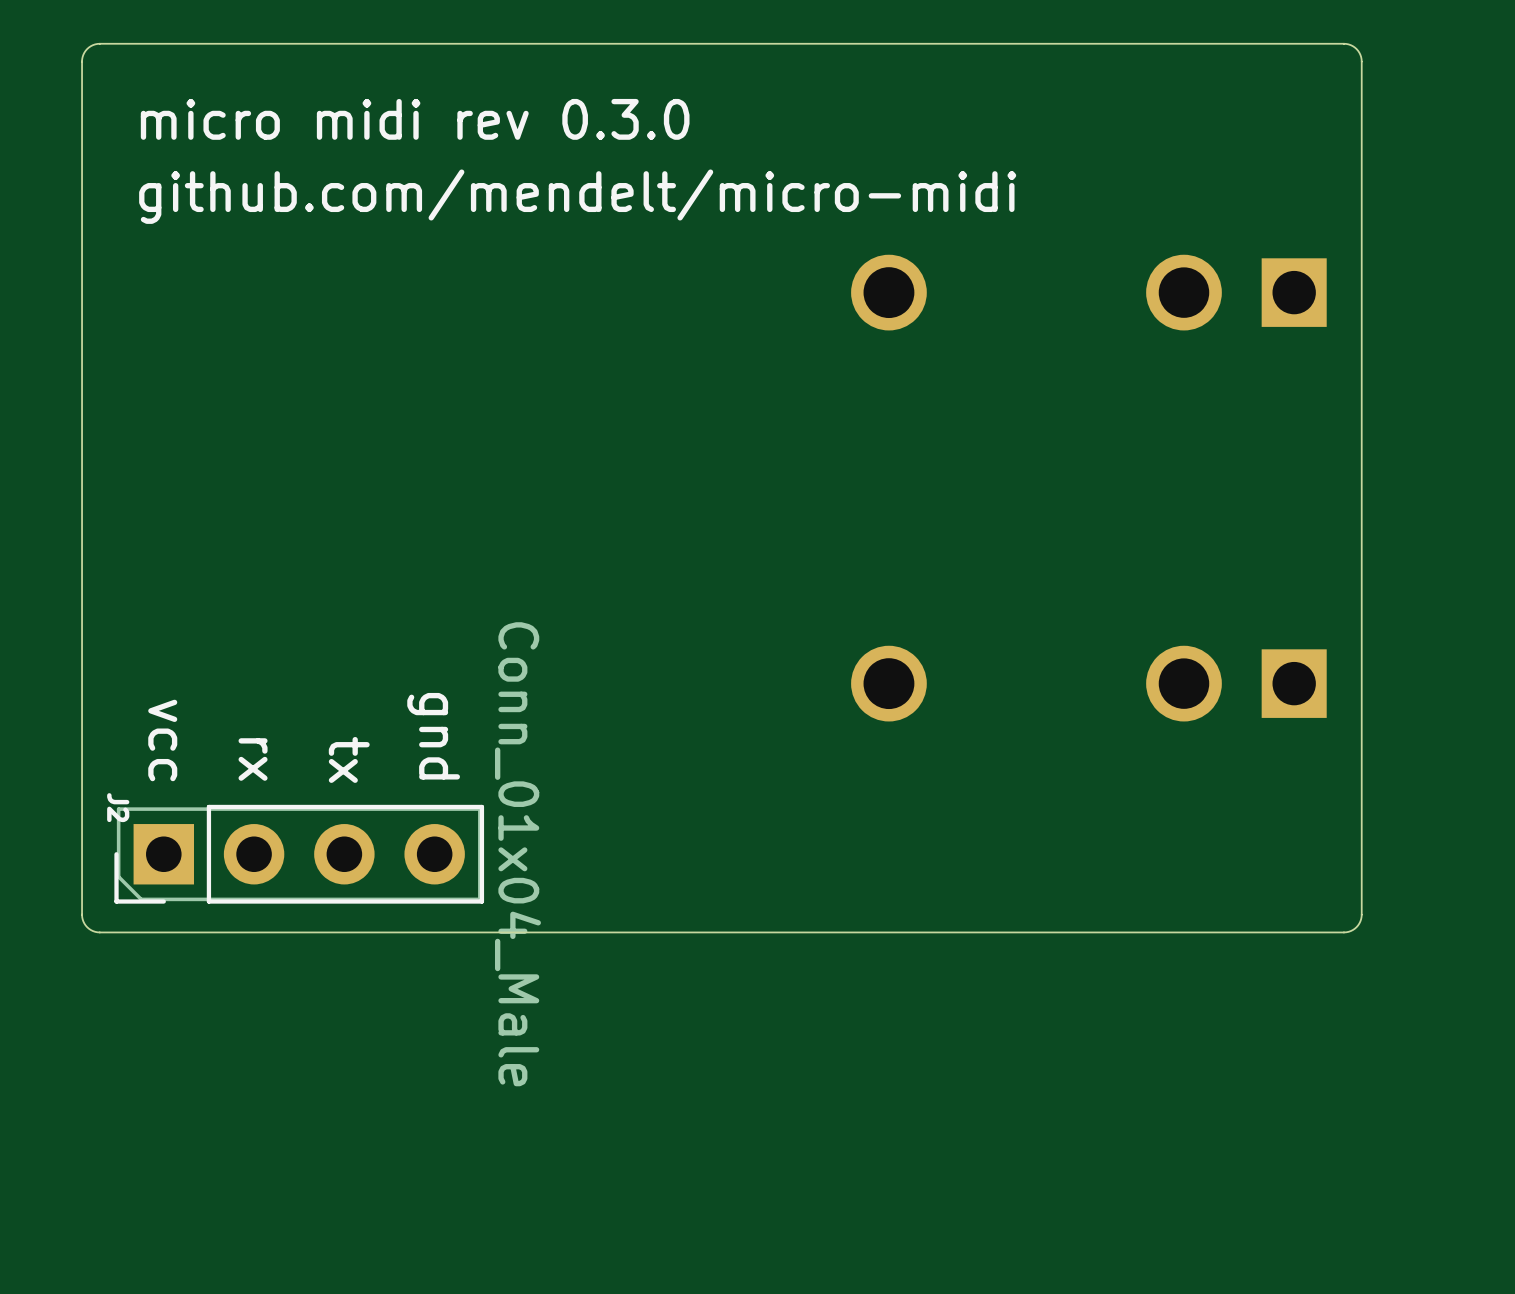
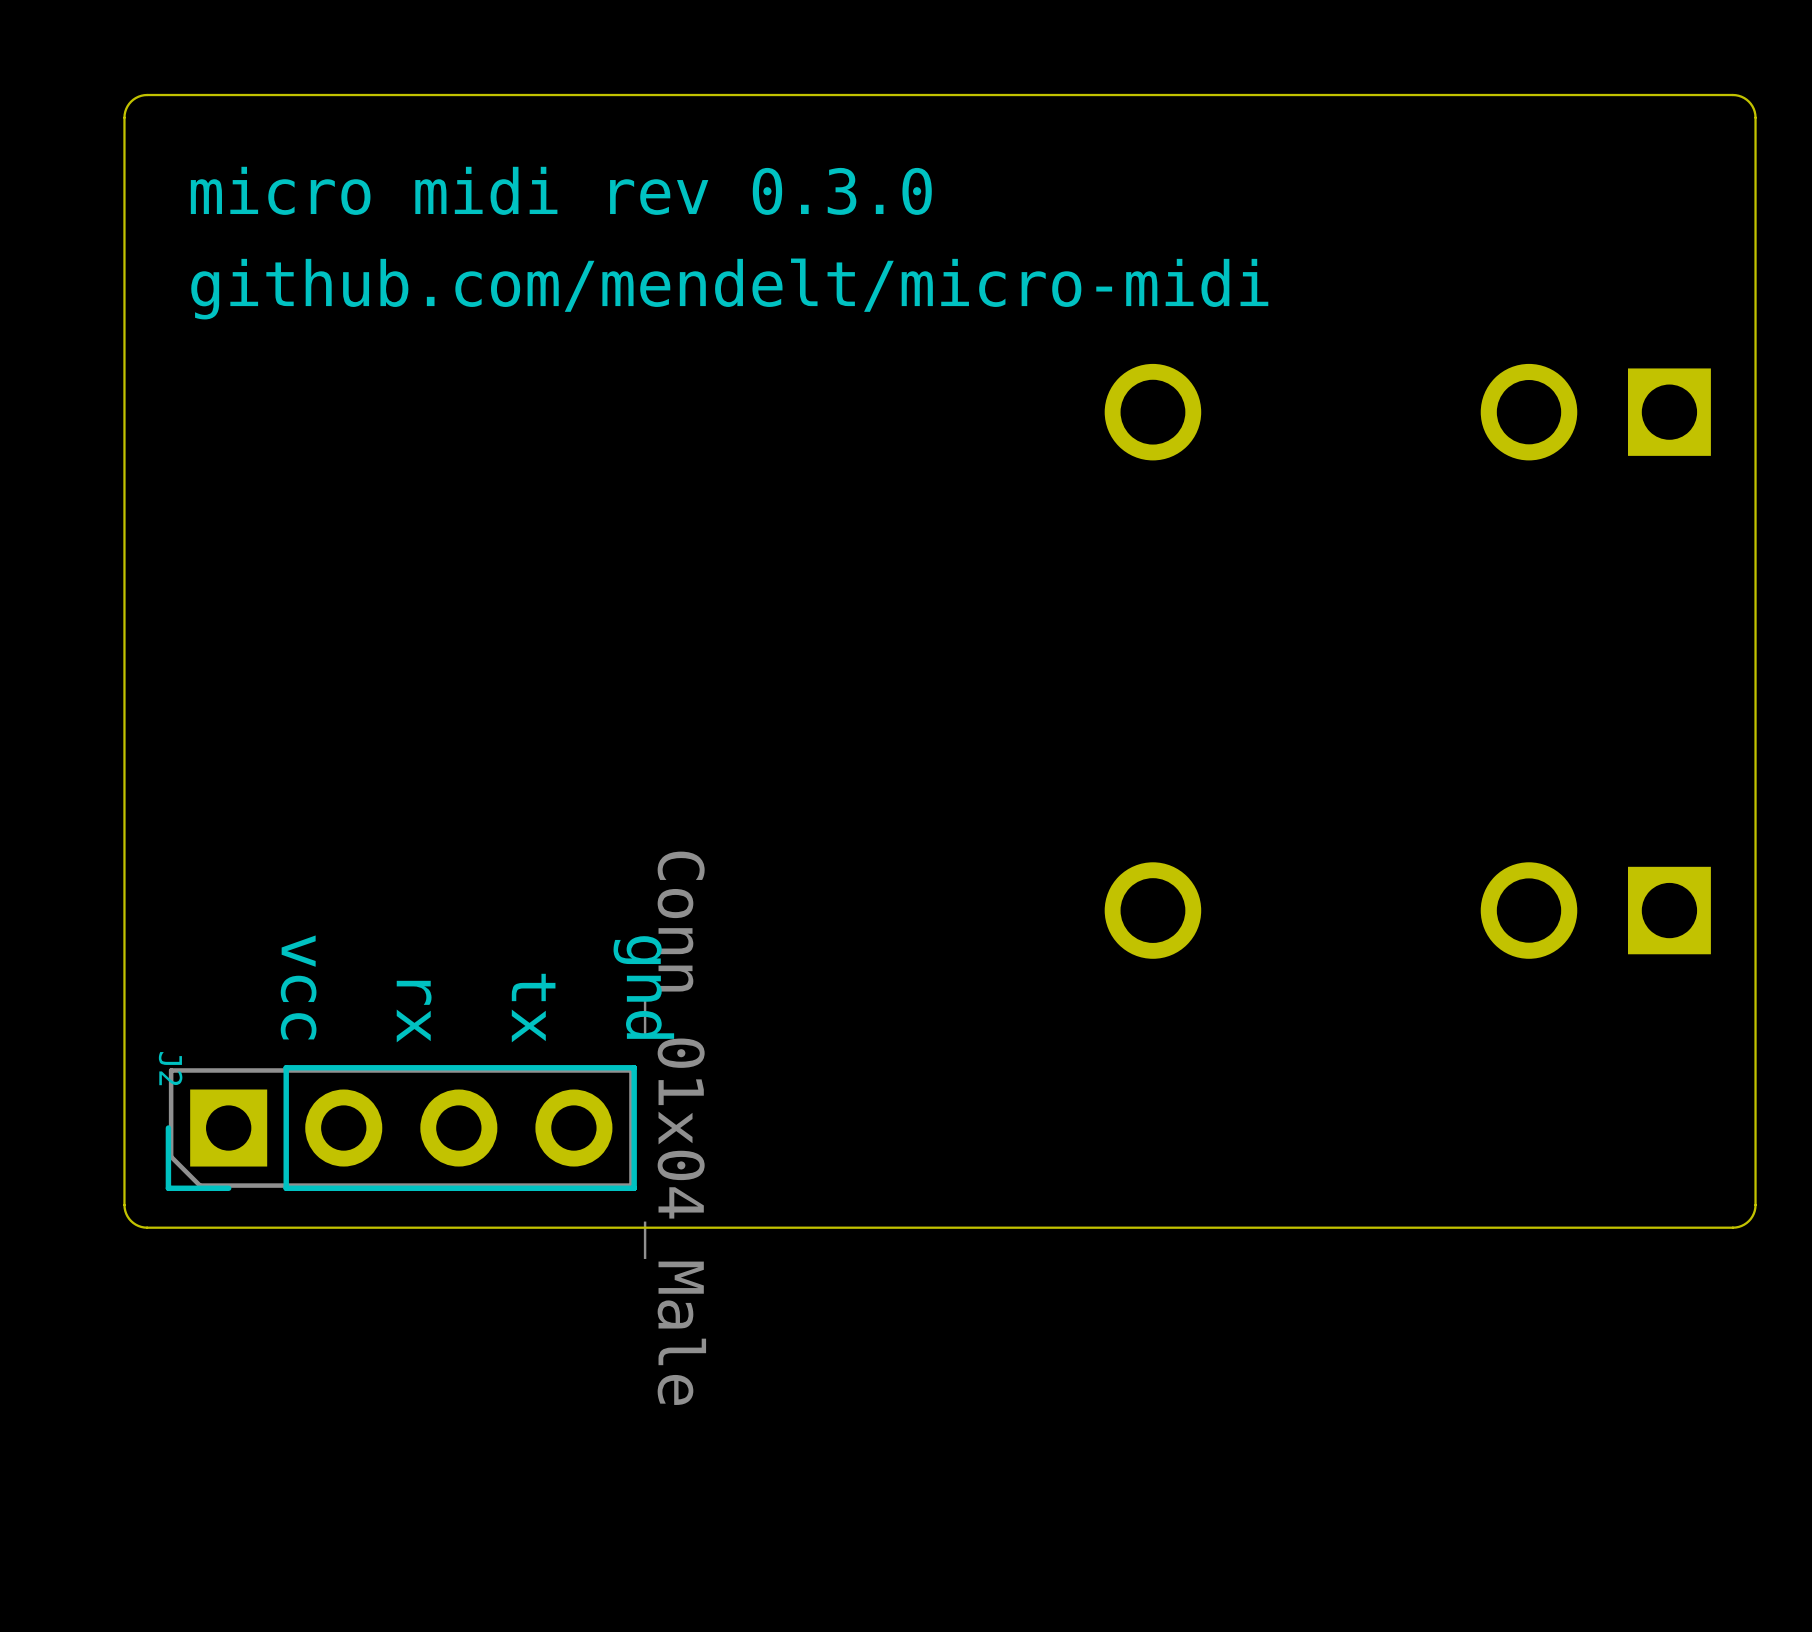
text position: gnd (433, 736) -> gnd (643, 987)
text position: vcc (162, 740) -> vcc (298, 987)
text position: rx (253, 759) -> rx (414, 1011)
text position: tx (349, 759) -> tx (533, 1008)

